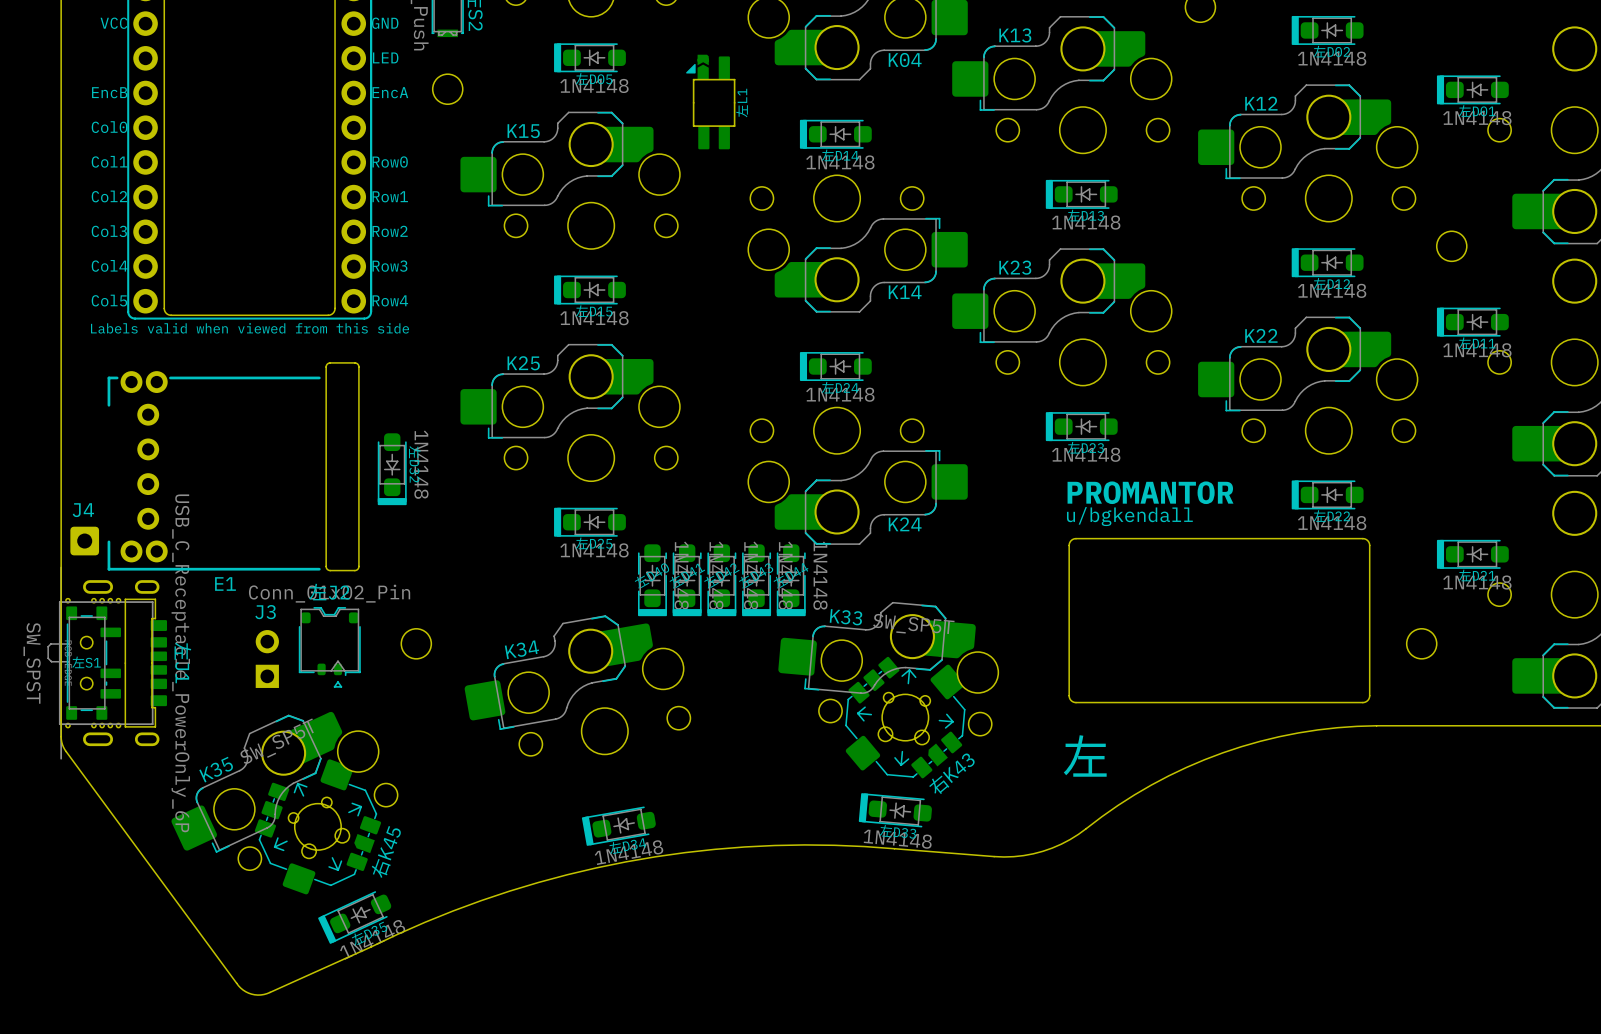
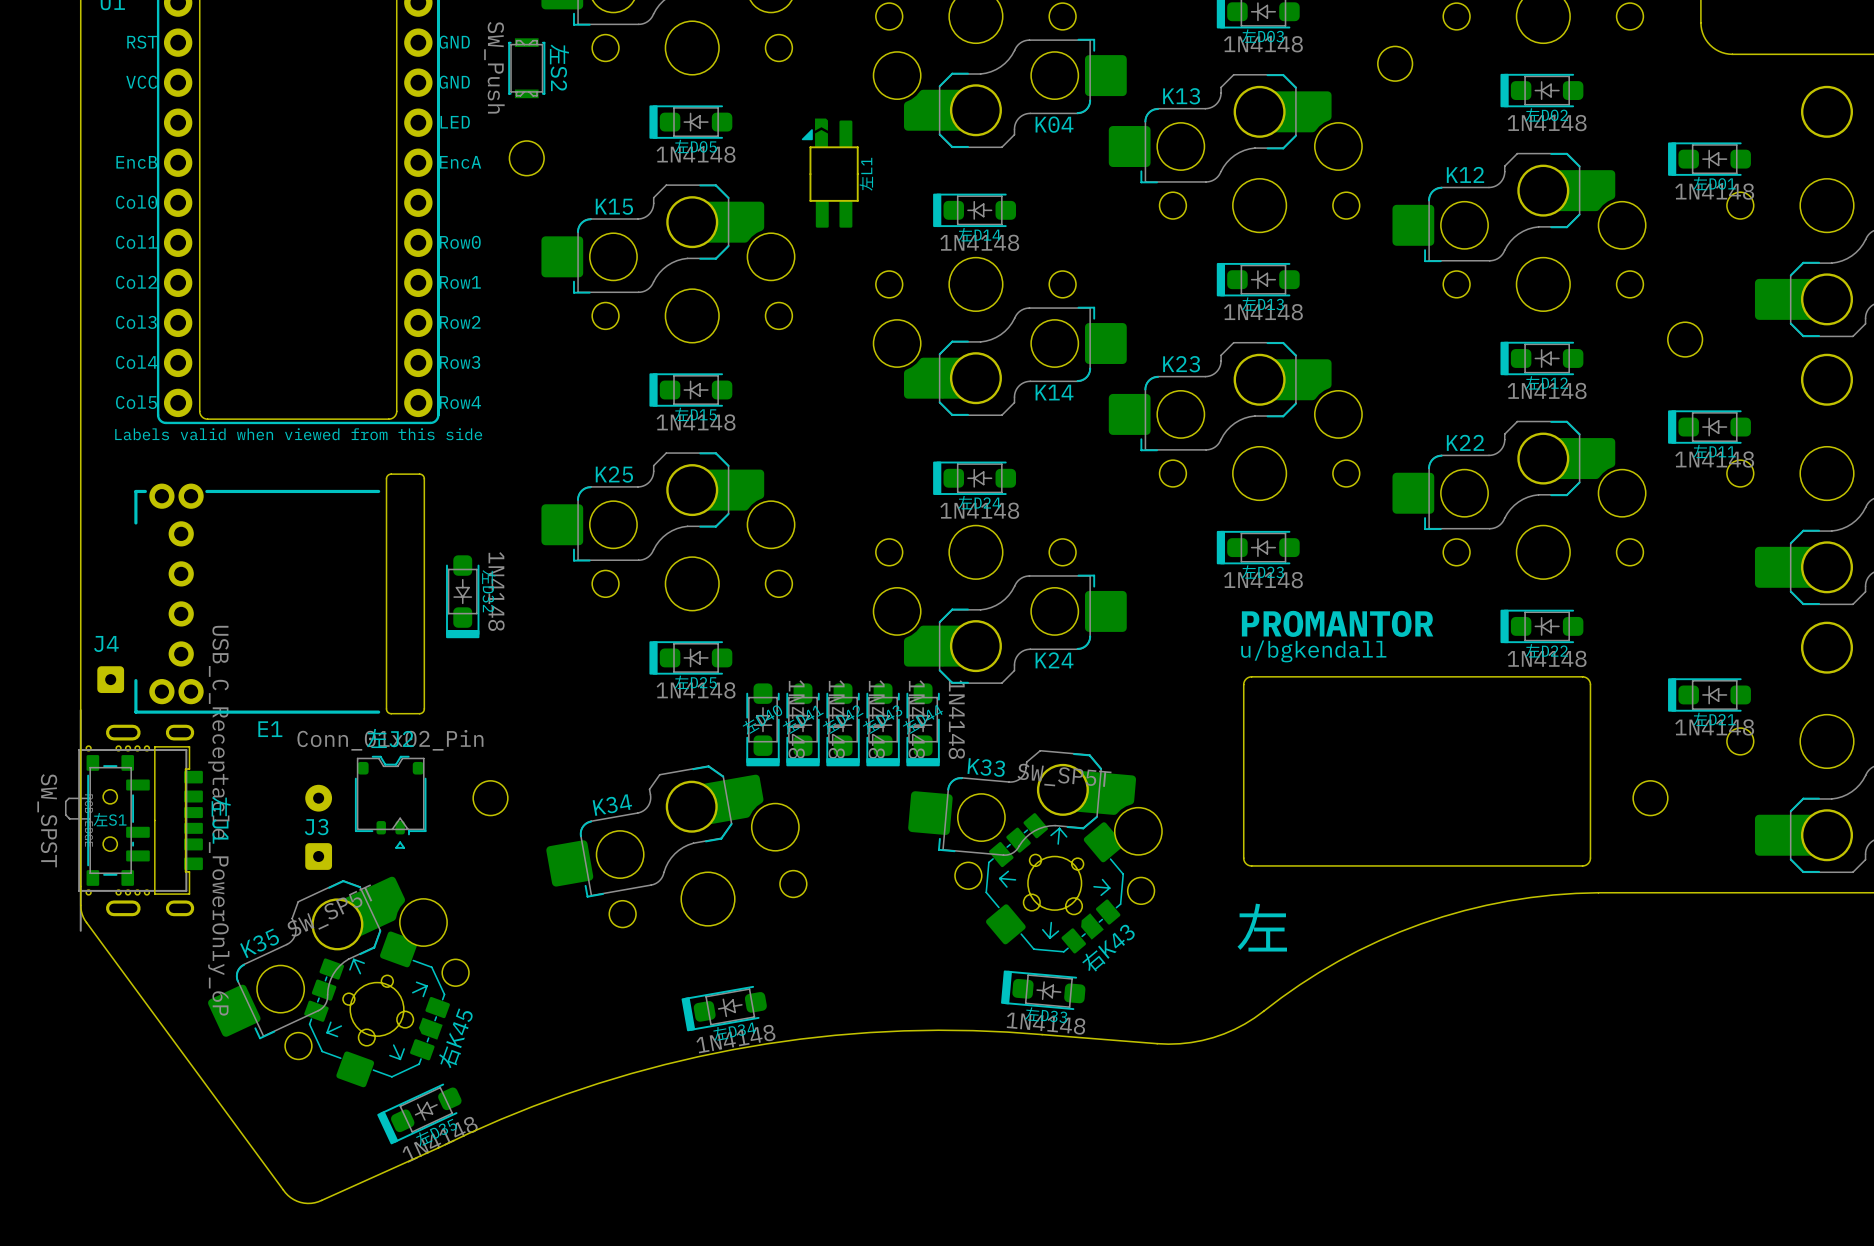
part footprint: [70, 526, 100, 556] -> [97, 666, 125, 694]
text position: J3 (265, 612) -> J3 (316, 827)
part footprint: [255, 630, 279, 688] -> [305, 784, 333, 870]

